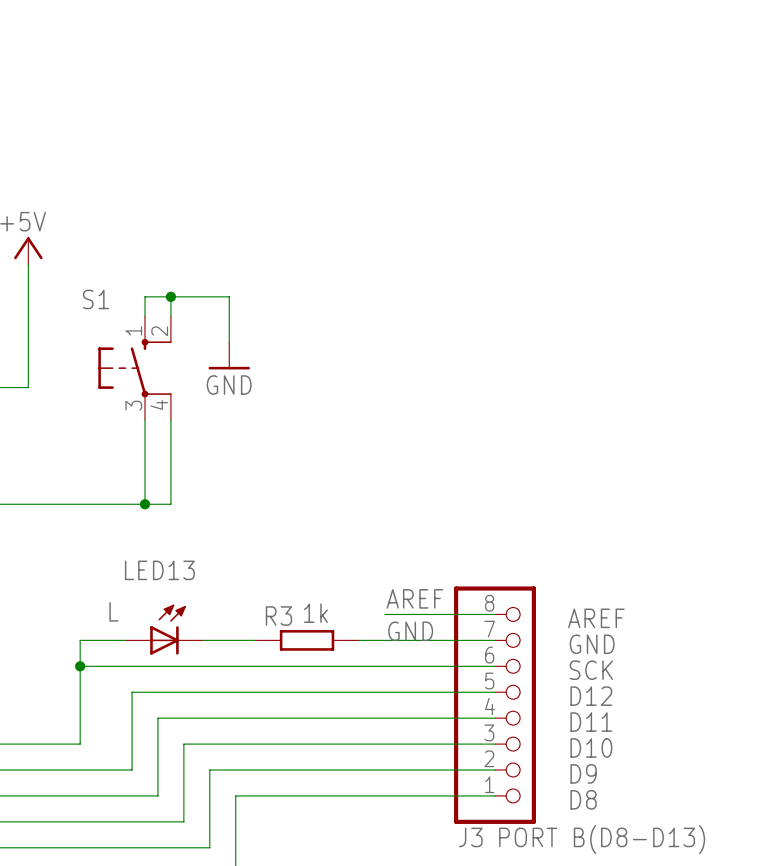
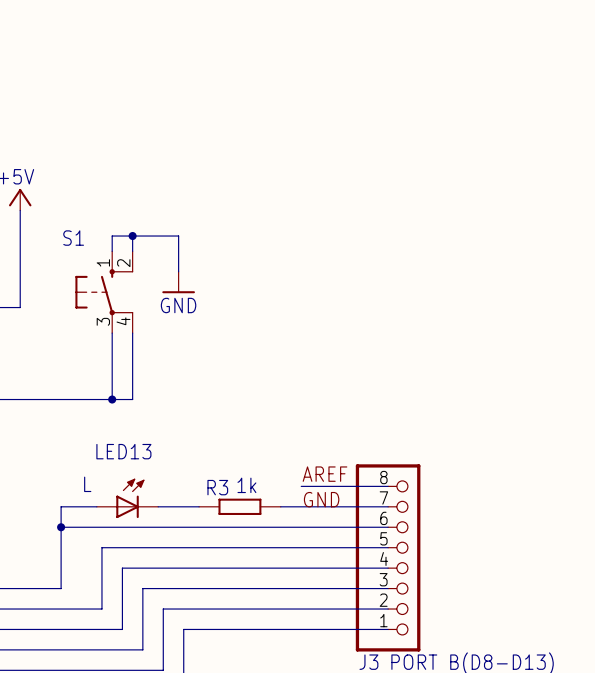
label: AREF (596, 618) -> none
label: GND (592, 644) -> none
label: SCK (591, 670) -> none
label: D12 (591, 696) -> none
label: D11 (591, 722) -> none
label: D10 (591, 747) -> none
label: D9 (583, 773) -> none
label: D8 (583, 799) -> none

